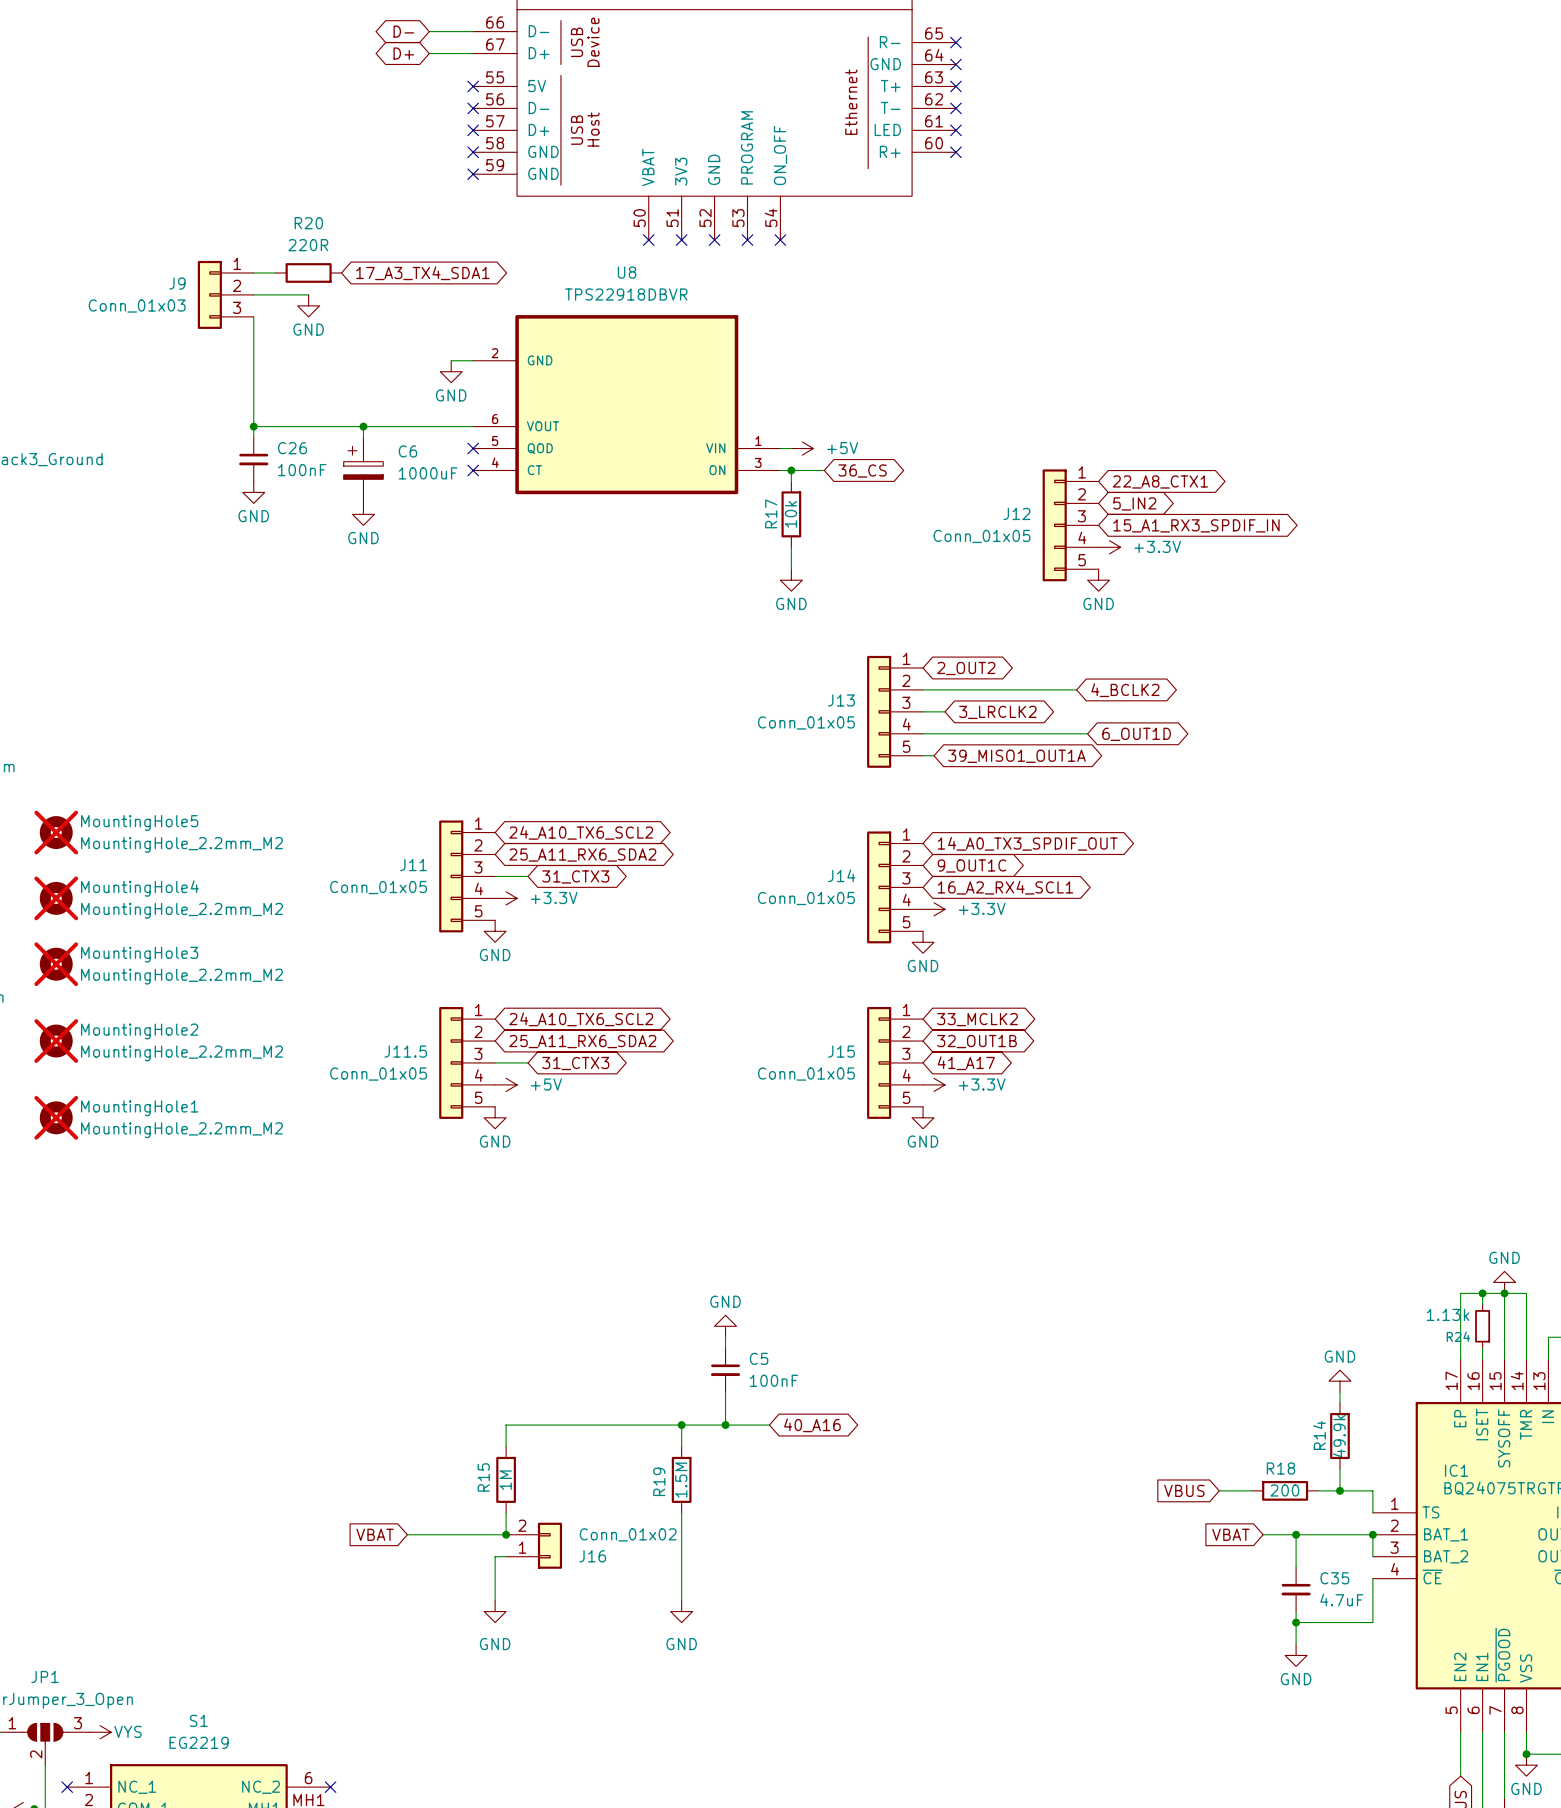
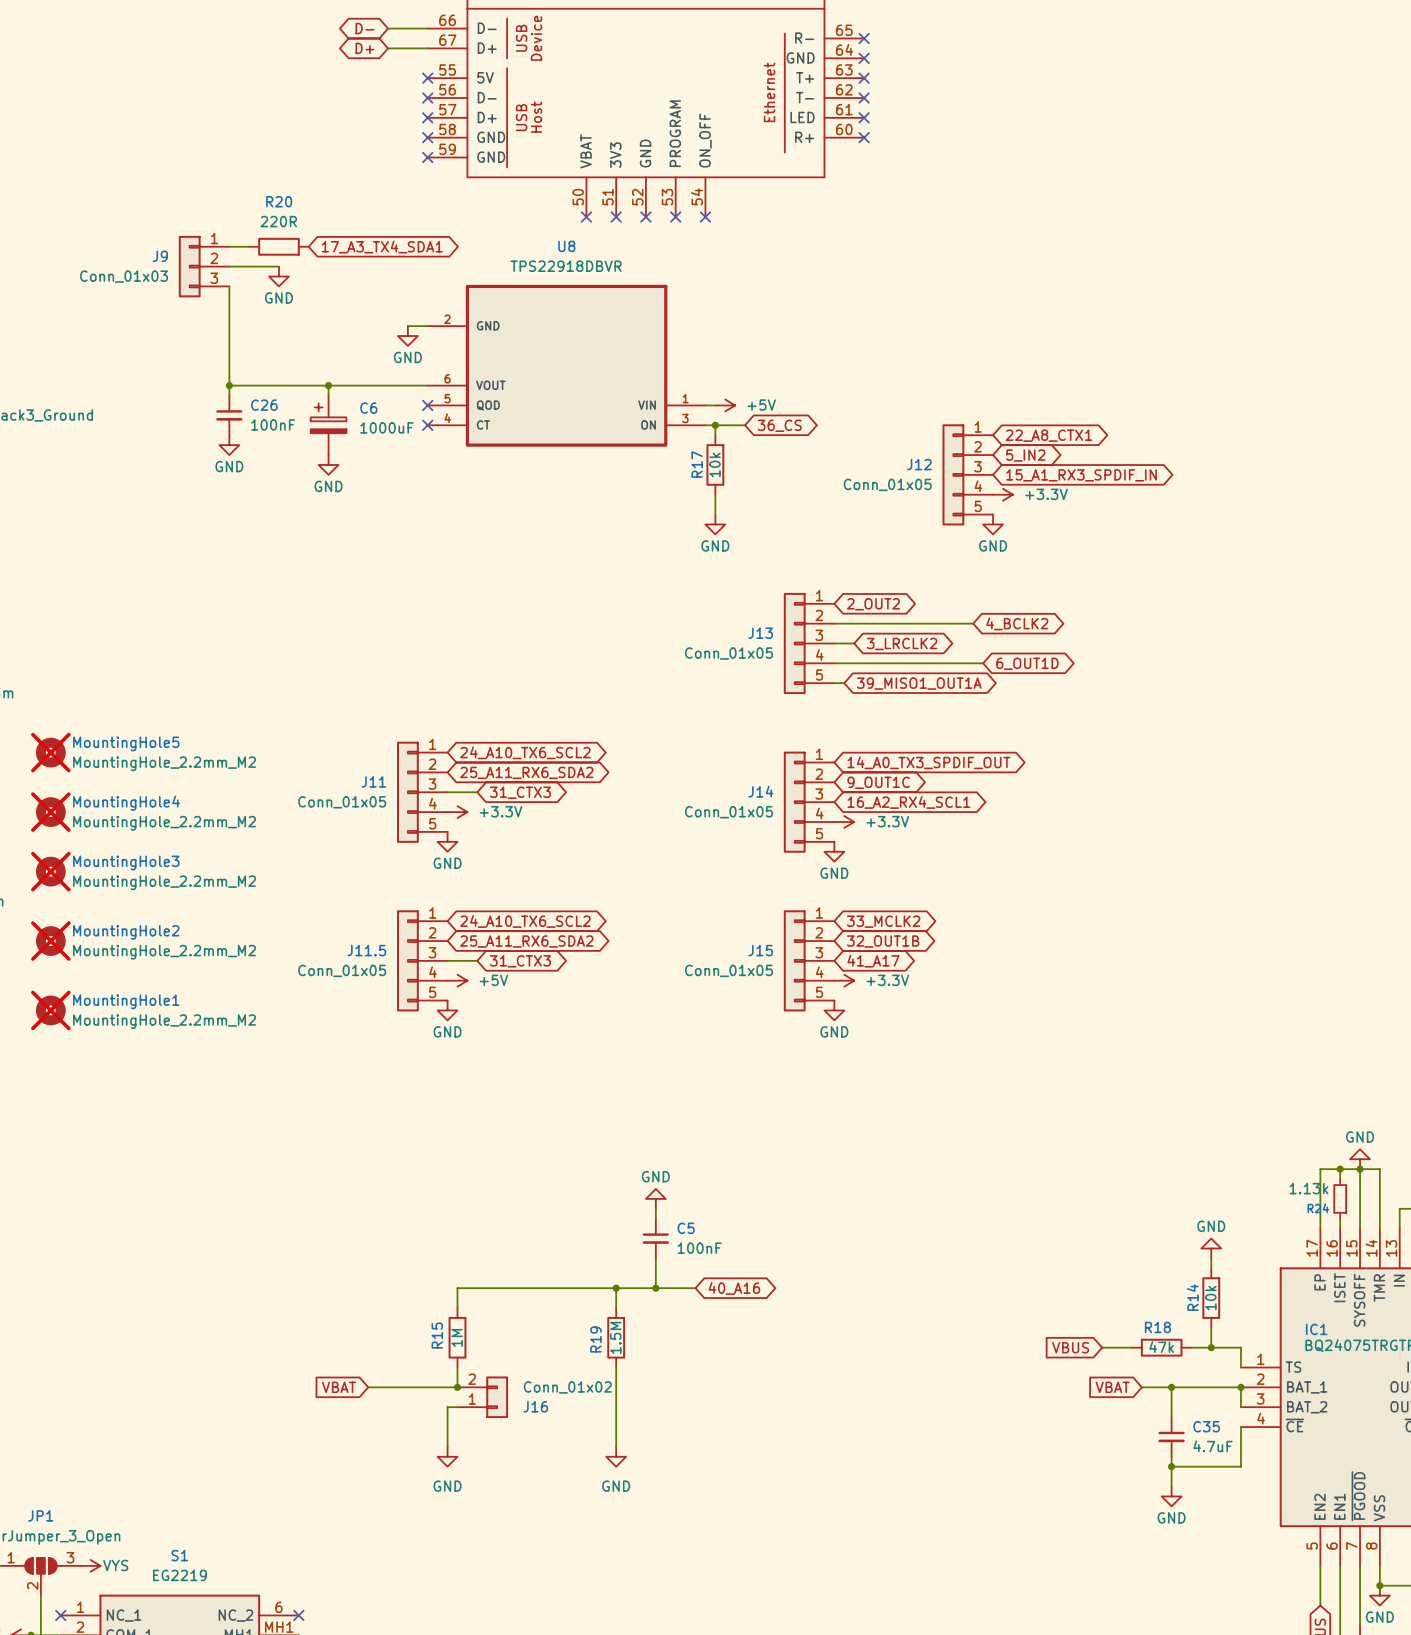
R14 value: 49.9k (1339, 1436) -> 10k (1210, 1298)
R18 value: 200 (1284, 1490) -> 47k (1161, 1347)

